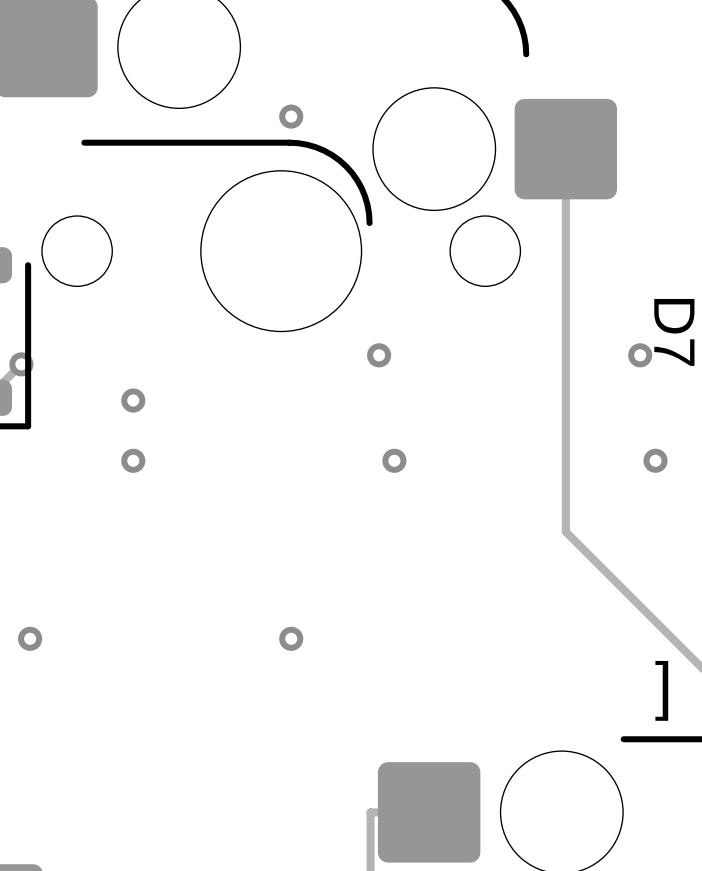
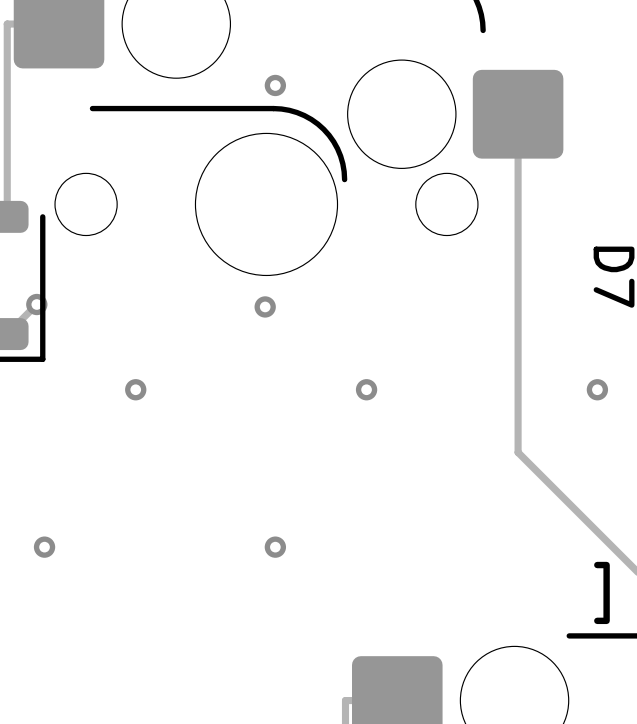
via: (379, 355) -> none
via: (640, 355) -> none
via: none -> (265, 306)
via: (133, 400) -> none

